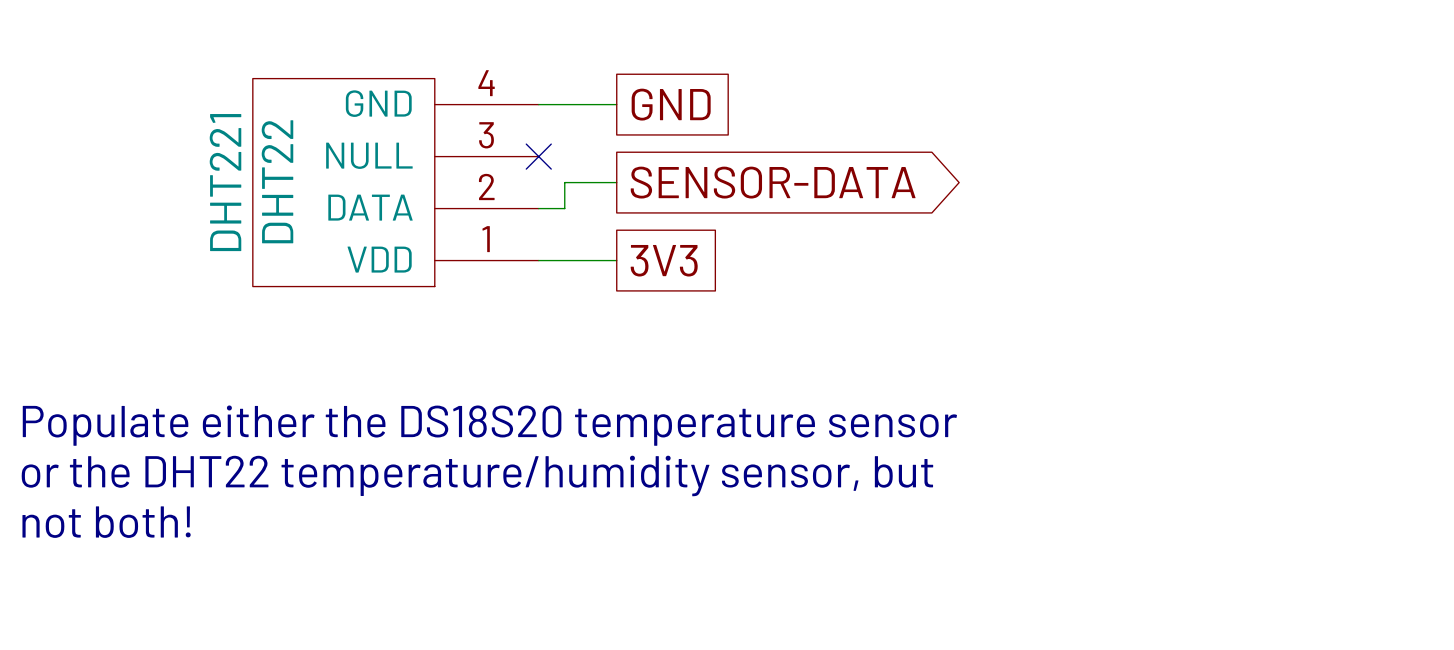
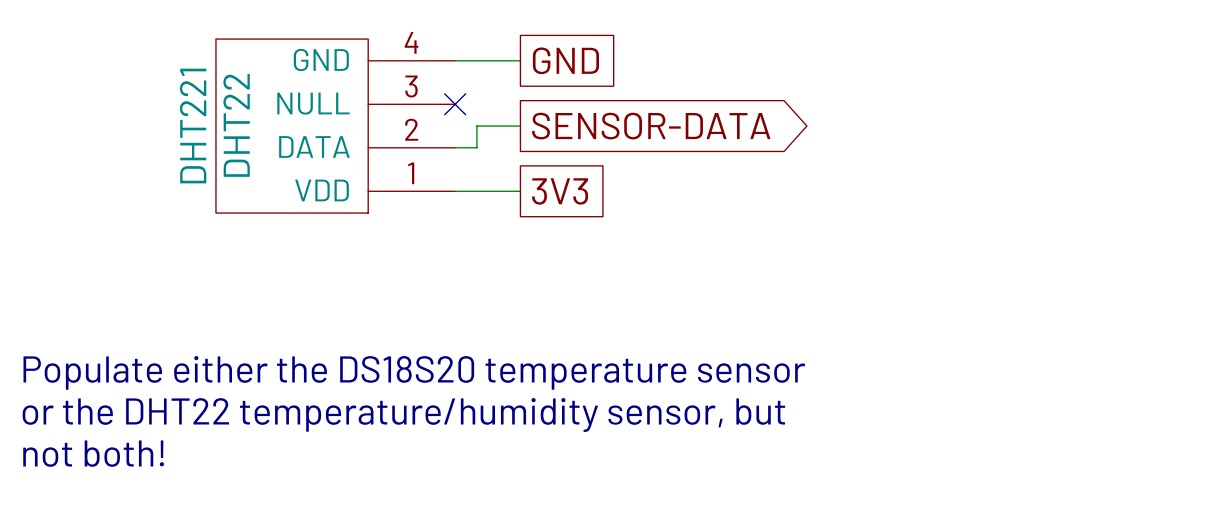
text: Populate either the DS18S20 temperature sensor (489, 425) -> none
text: or the DHT22 temperature/humidity sensor, but (477, 475) -> Populate either the DS18S20 temperature sensor (414, 372)
text: not both! (106, 522) -> or the DHT22 temperature/humidity sensor, but (403, 415)
text: none -> not both! (93, 453)

